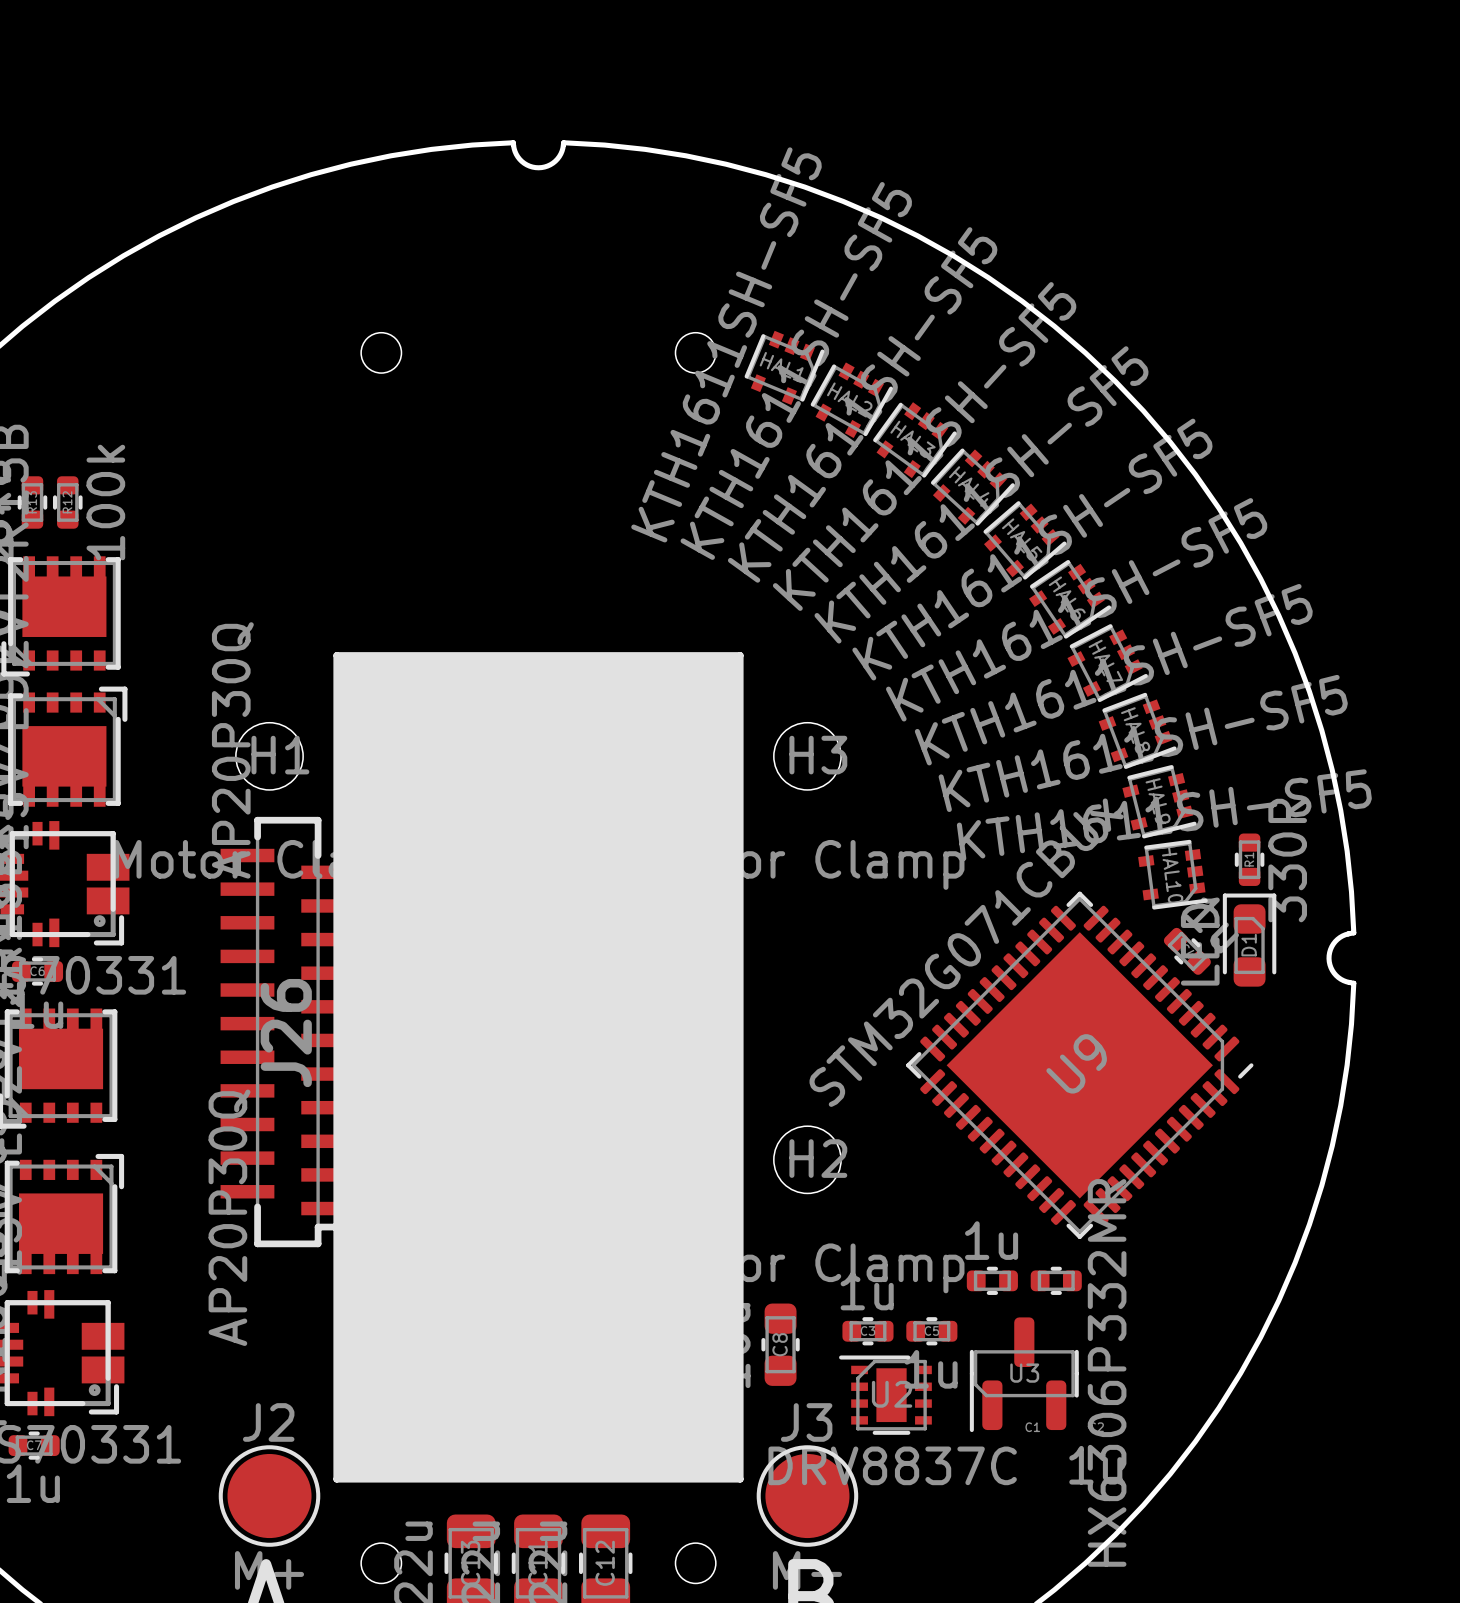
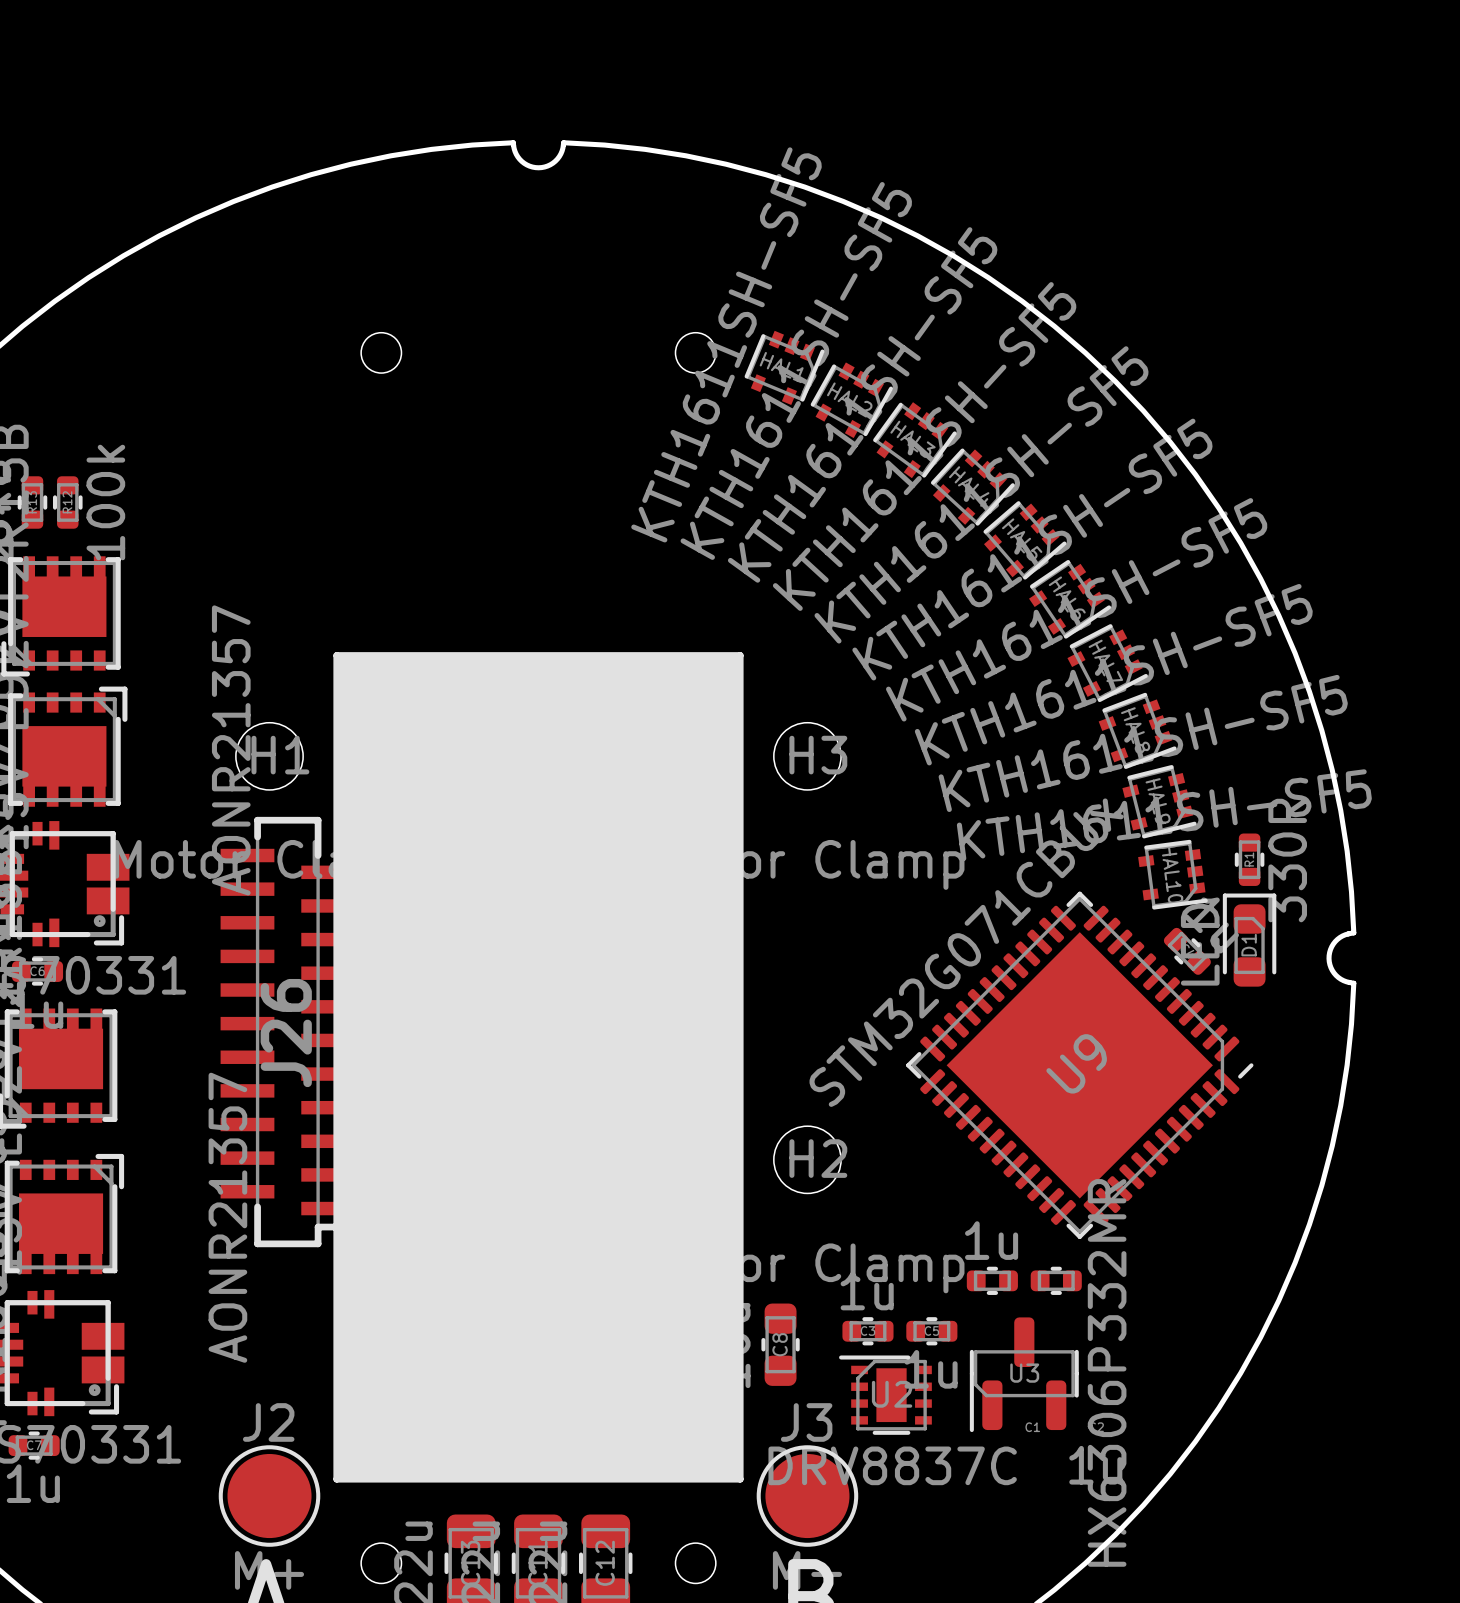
part value: AP20P30Q (232, 750) -> AONR21357 (231, 750)
part value: AP20P30Q (229, 1217) -> AONR21357 (227, 1217)

